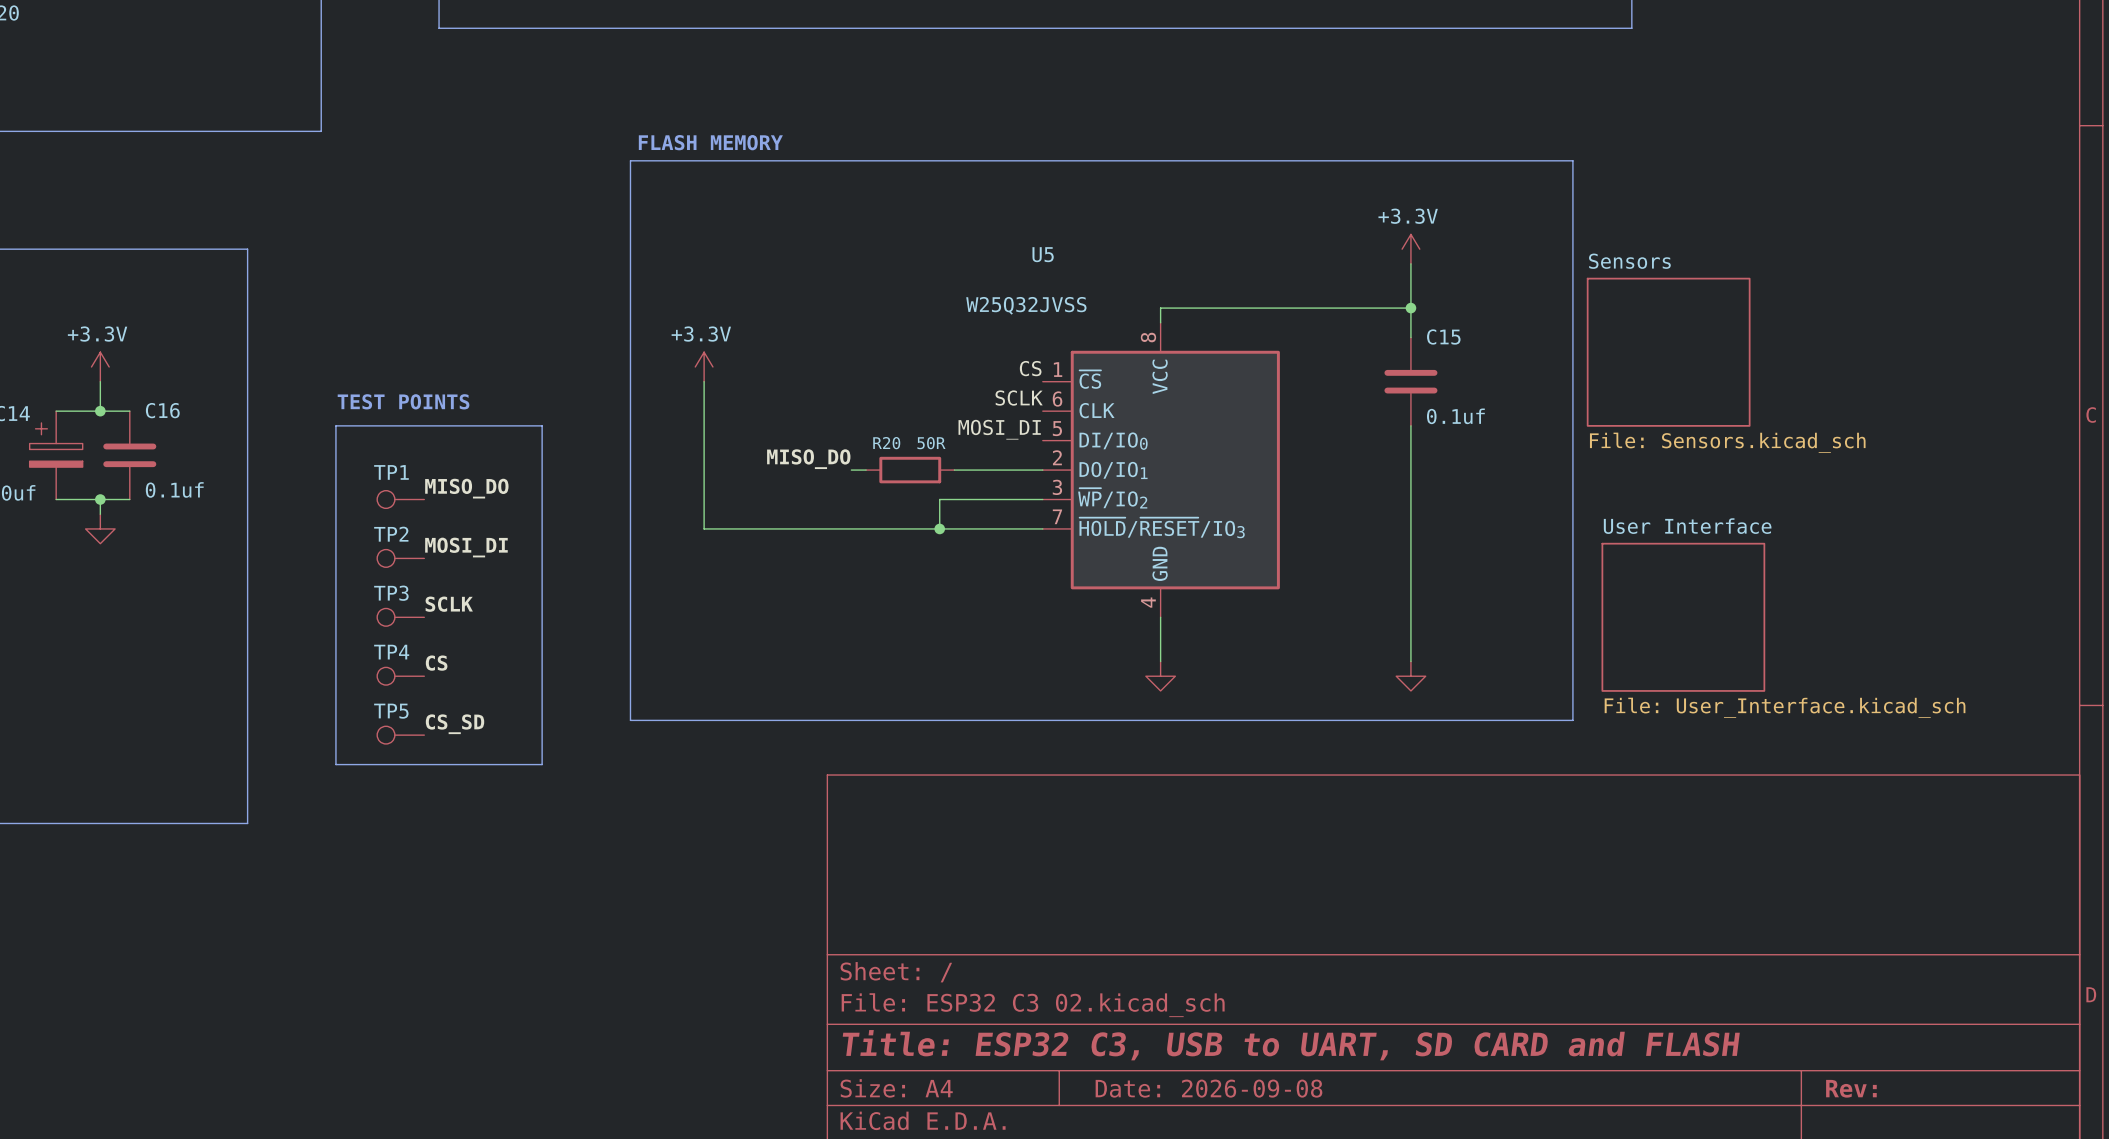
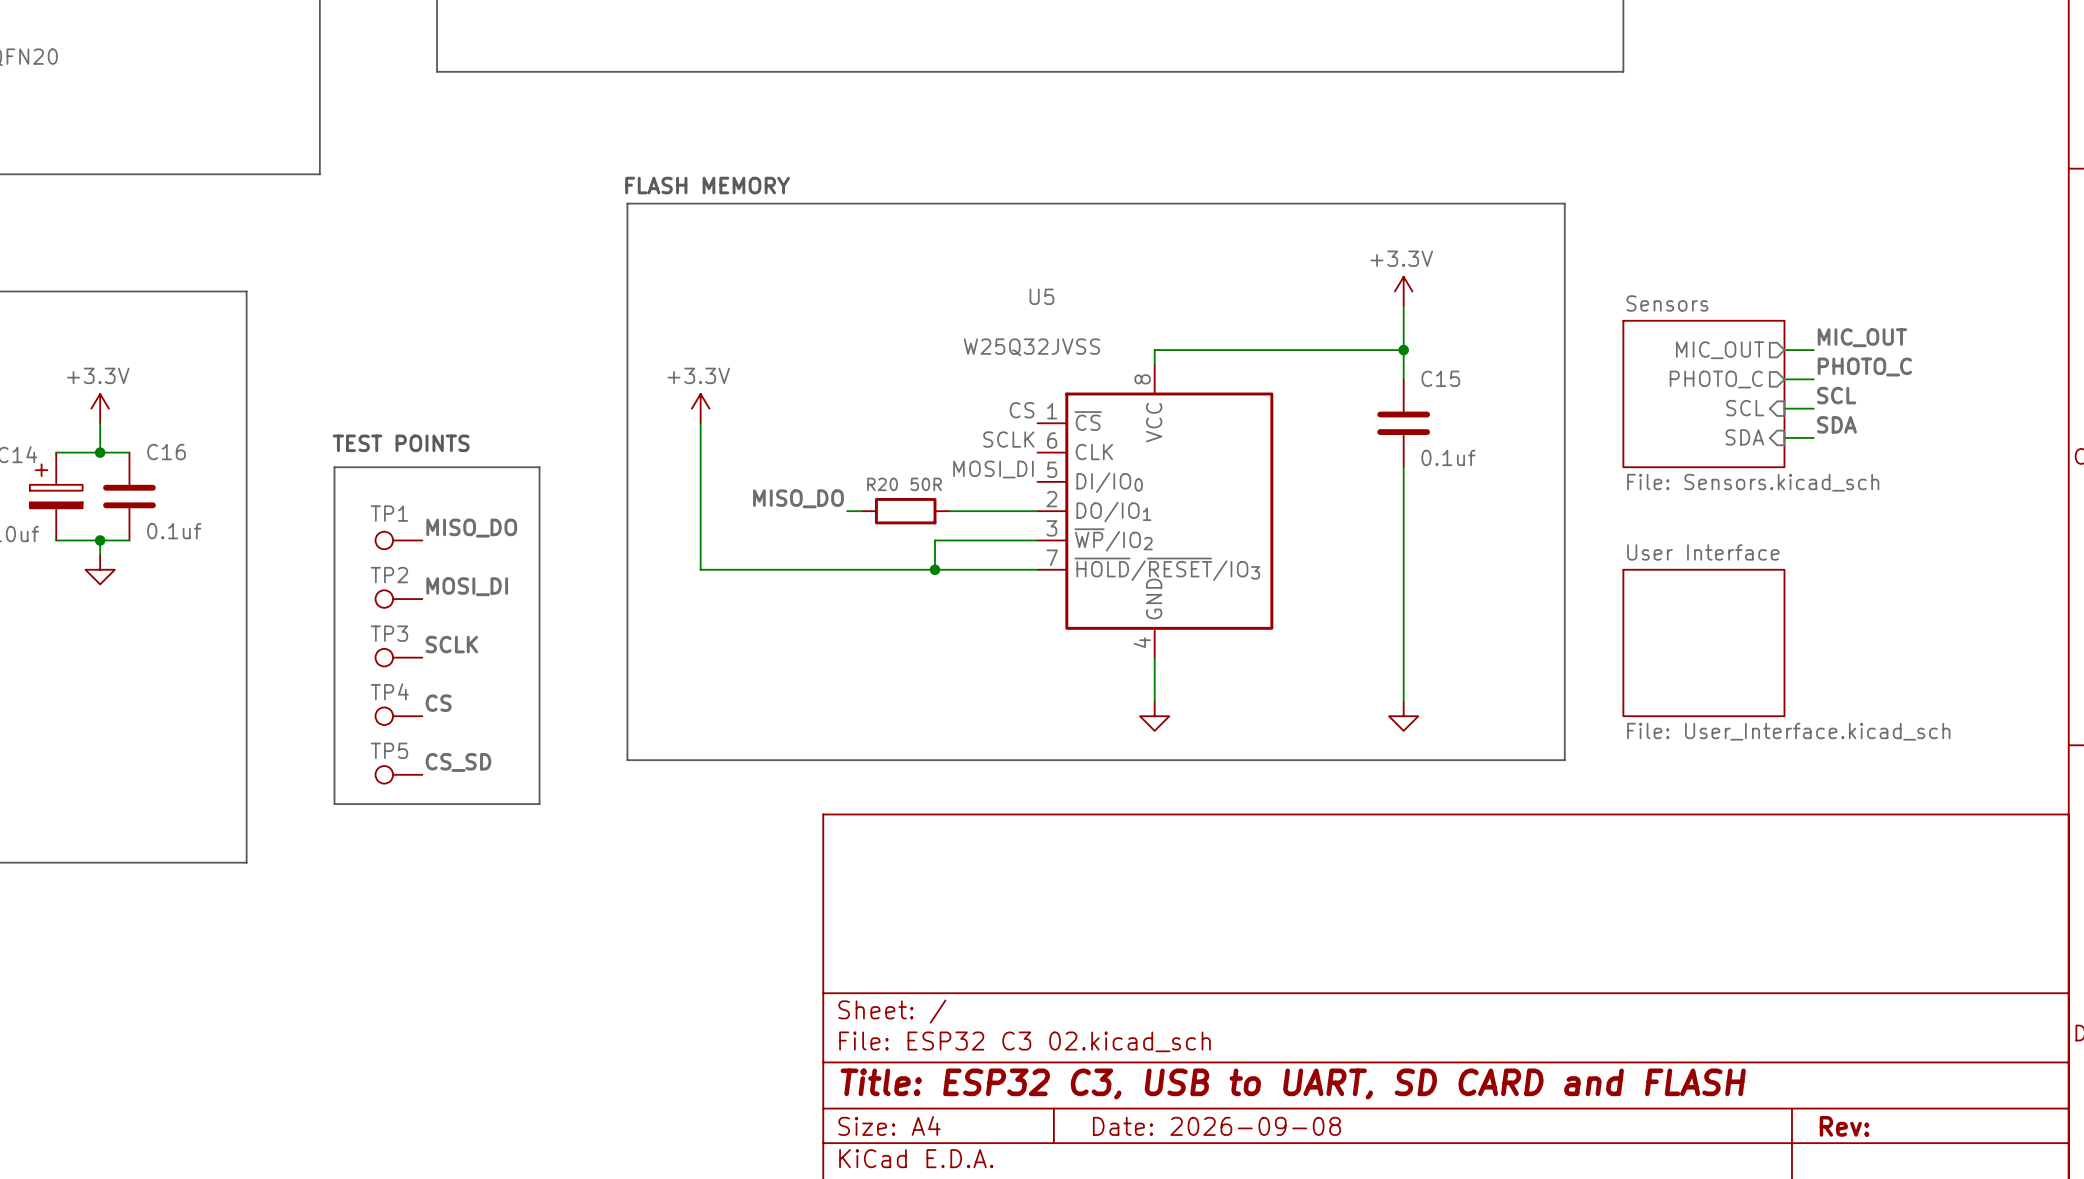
label: none -> MIC_OUT (1862, 337)
wire: none -> (1784, 350) (1813, 350)
sheet pin: none -> MIC_OUT (1720, 350)
label: none -> PHOTO_C (1864, 366)
wire: none -> (1784, 379) (1813, 379)
sheet pin: none -> PHOTO_C (1716, 379)
sheet Sensors position: (1668, 352) -> (1703, 394)
label: none -> SCL (1836, 395)
sheet pin: none -> SCL (1745, 408)
wire: none -> (1784, 408) (1813, 408)
label: none -> SDA (1836, 424)
sheet pin: none -> SDA (1744, 437)
wire: none -> (1784, 437) (1813, 437)
sheet User Interface position: (1683, 617) -> (1703, 642)

